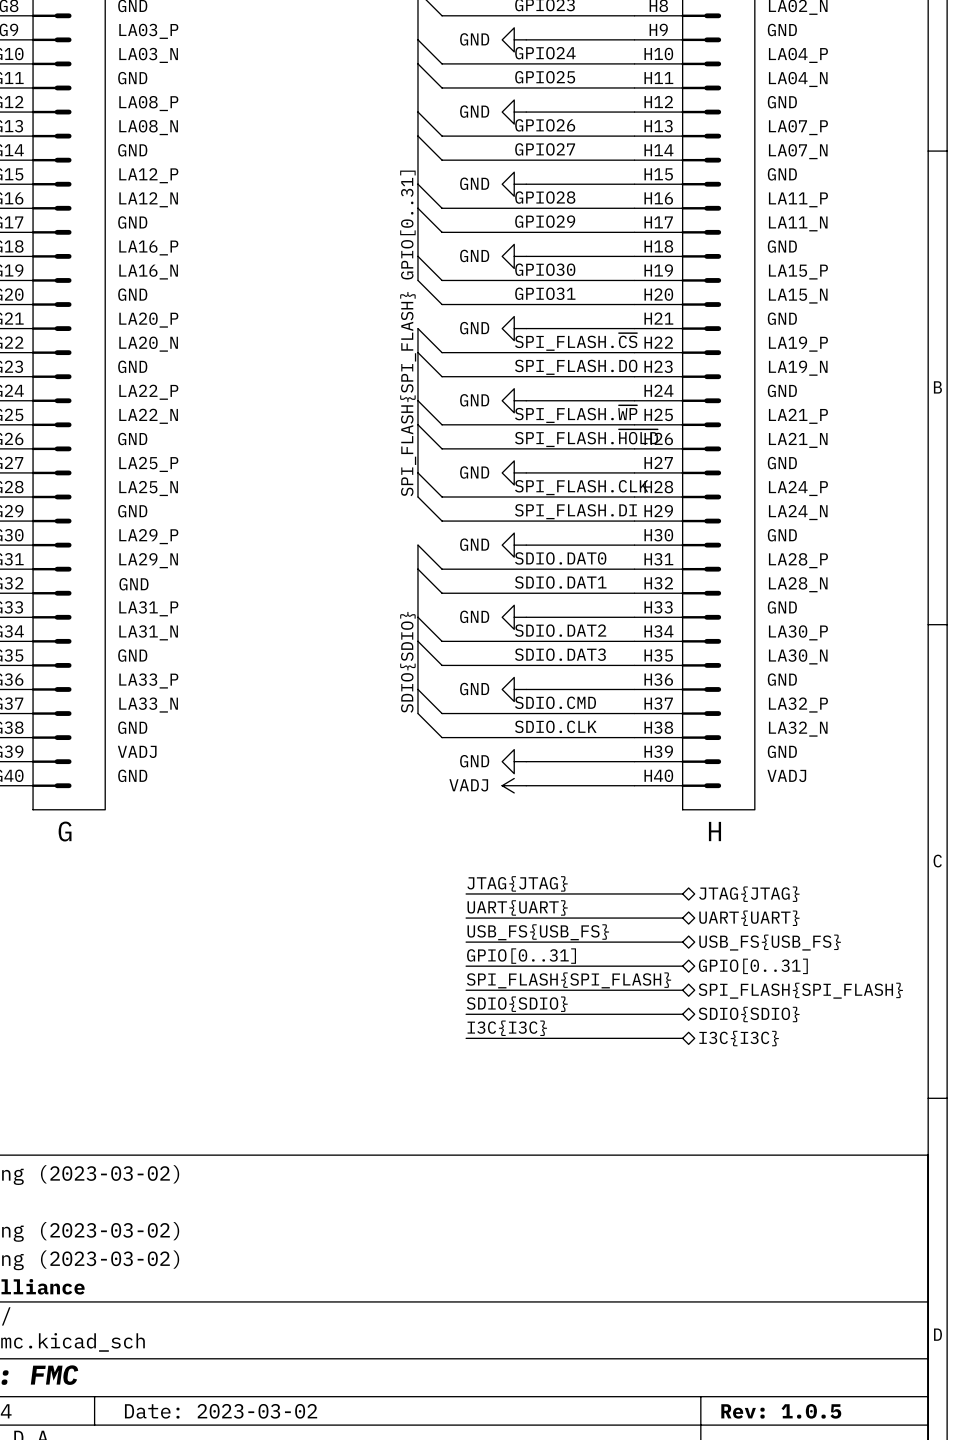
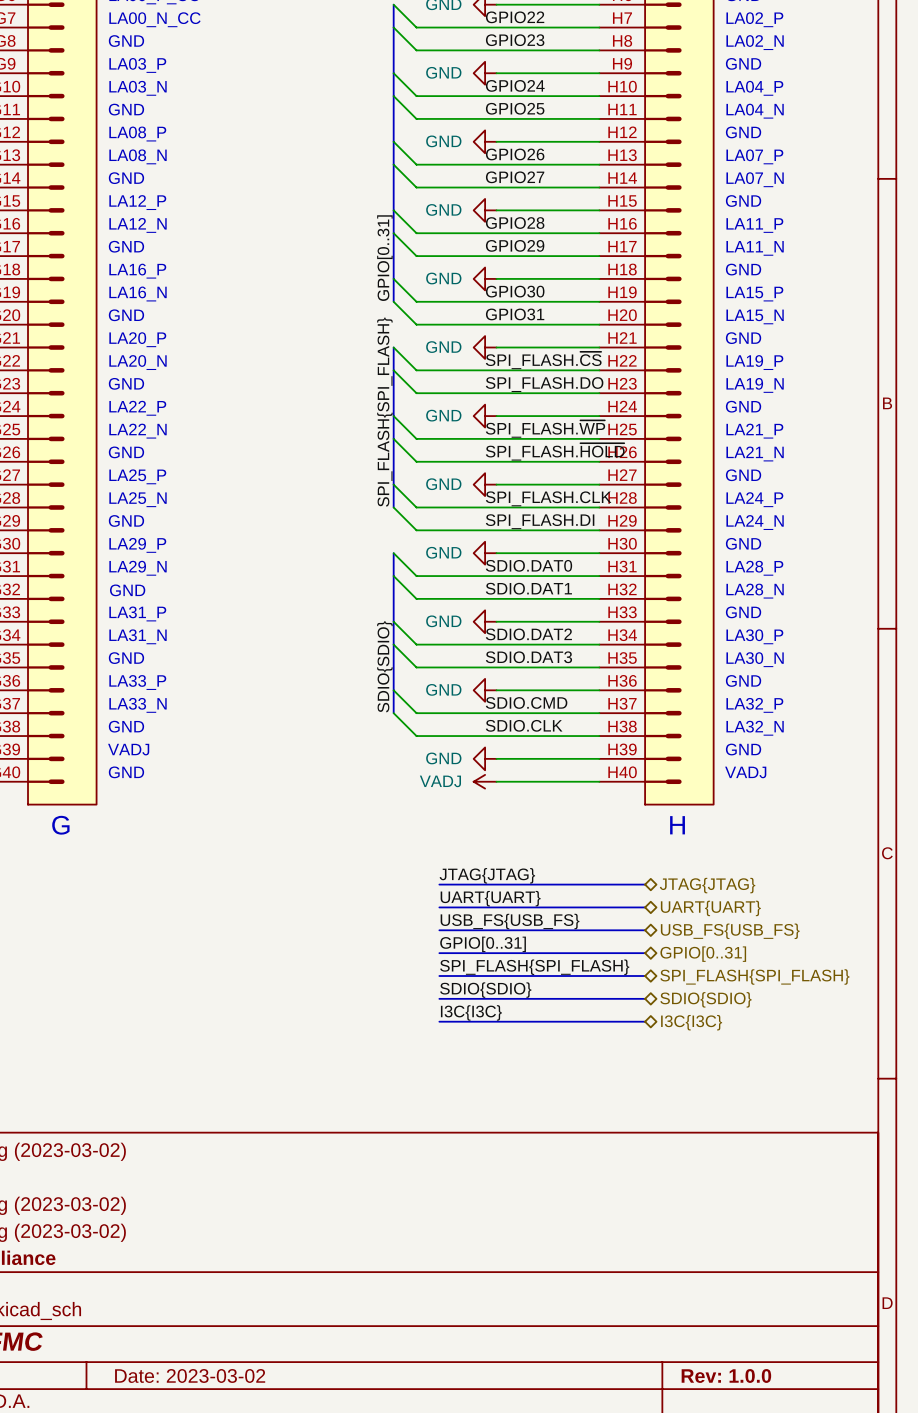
title block: Rev: 1.0.5 (781, 1411) -> Rev: 1.0.0 (726, 1375)

